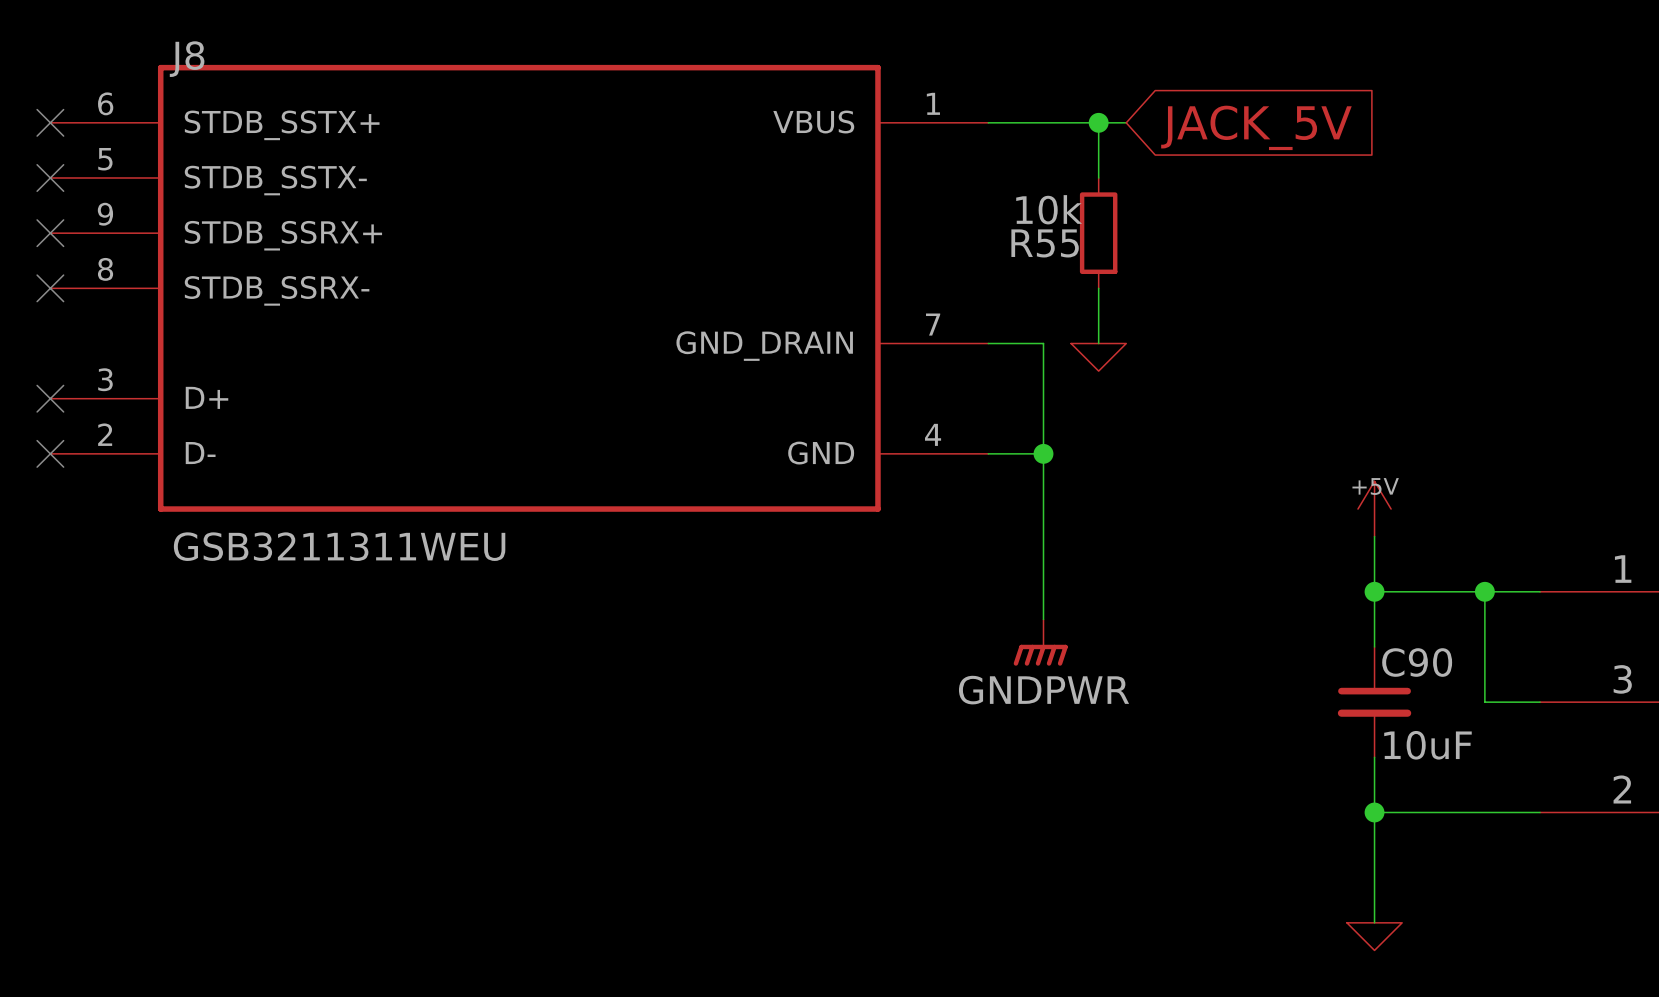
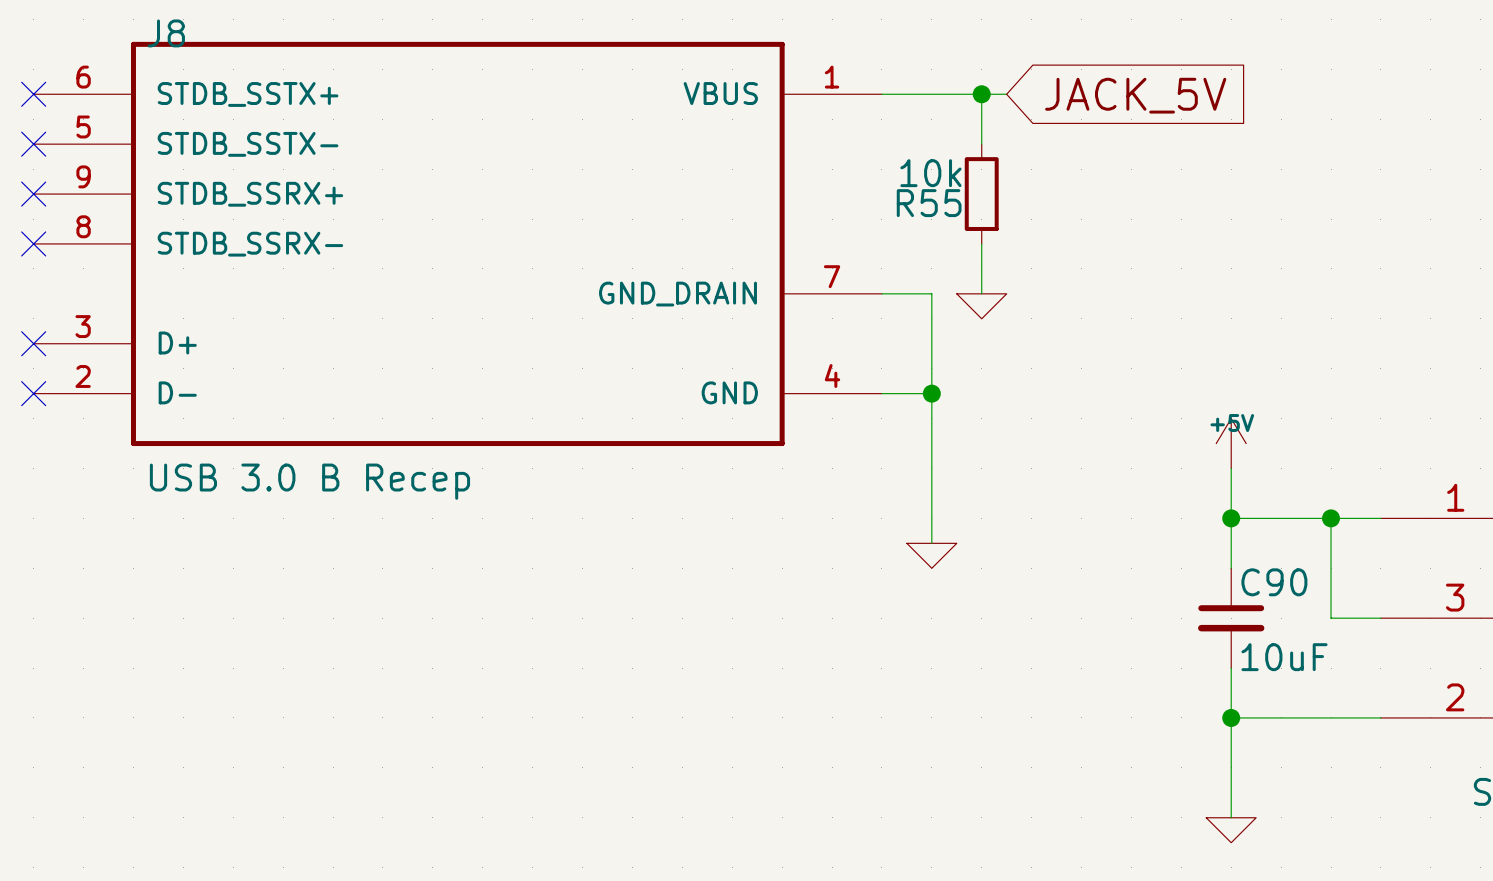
J8 value: GSB3211311WEU (339, 546) -> USB 3.0 B Recep (309, 481)
power symbol shape: [1013, 619, 1068, 666] -> [906, 543, 957, 569]
power symbol text: GNDPWR (1044, 690) -> none

